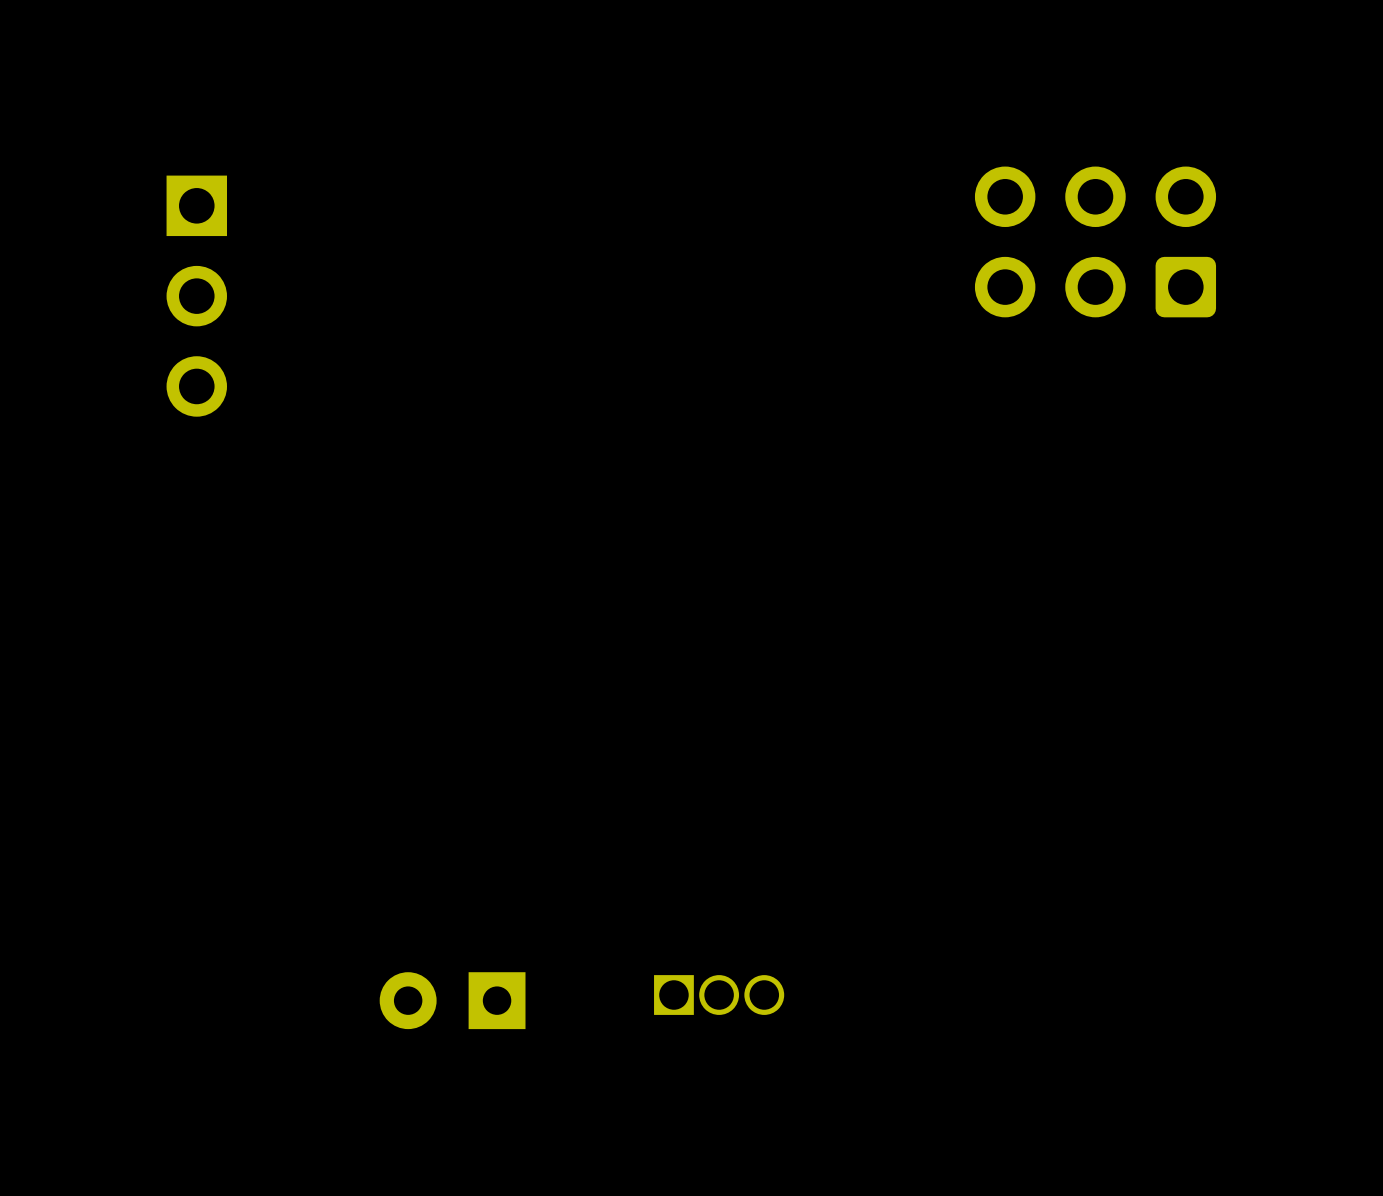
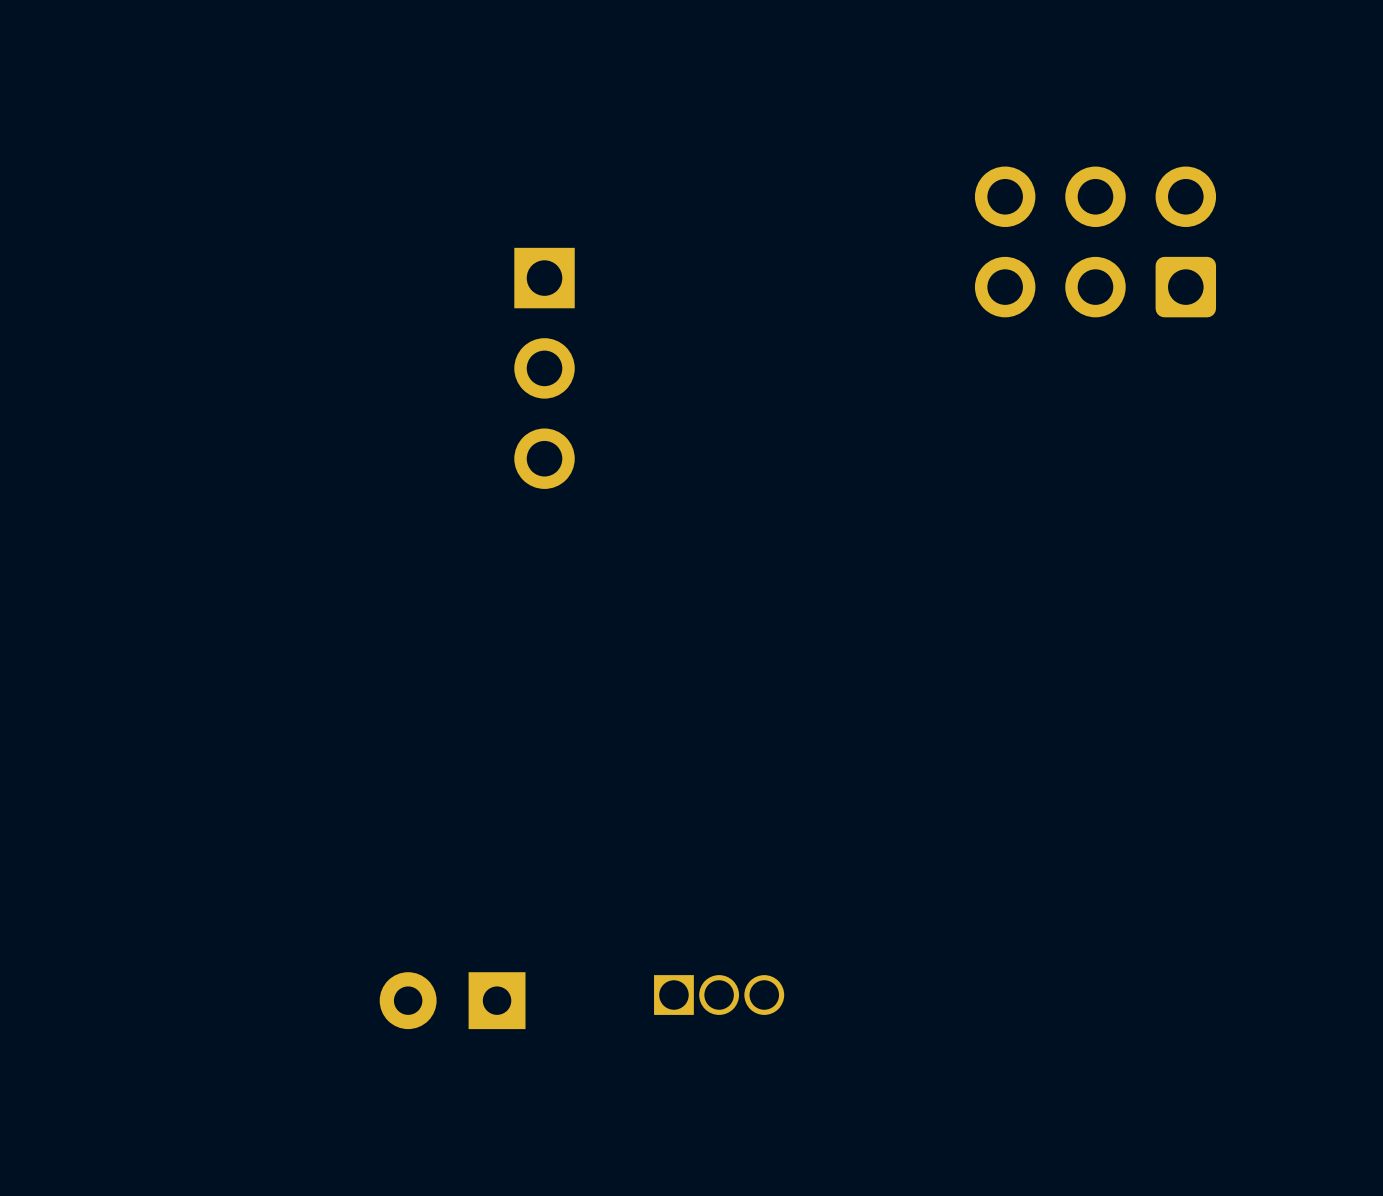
part position: (196, 296) -> (544, 368)

